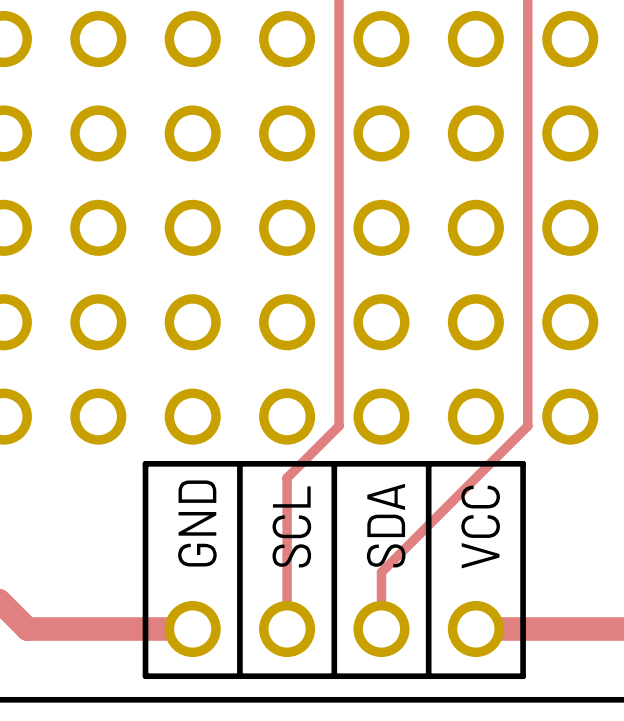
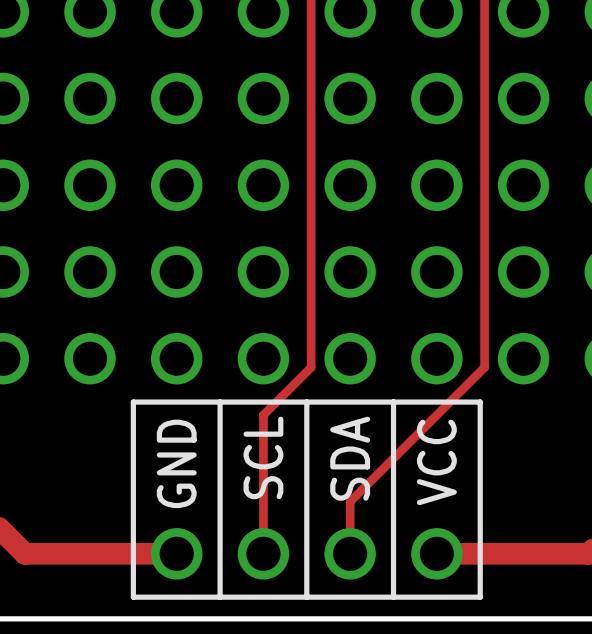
text position: GND (197, 523) -> GND (176, 463)
text position: SDA (386, 525) -> SDA (350, 458)
text position: SCL (291, 526) -> SCL (263, 457)
text position: VCC (480, 526) -> VCC (436, 462)

